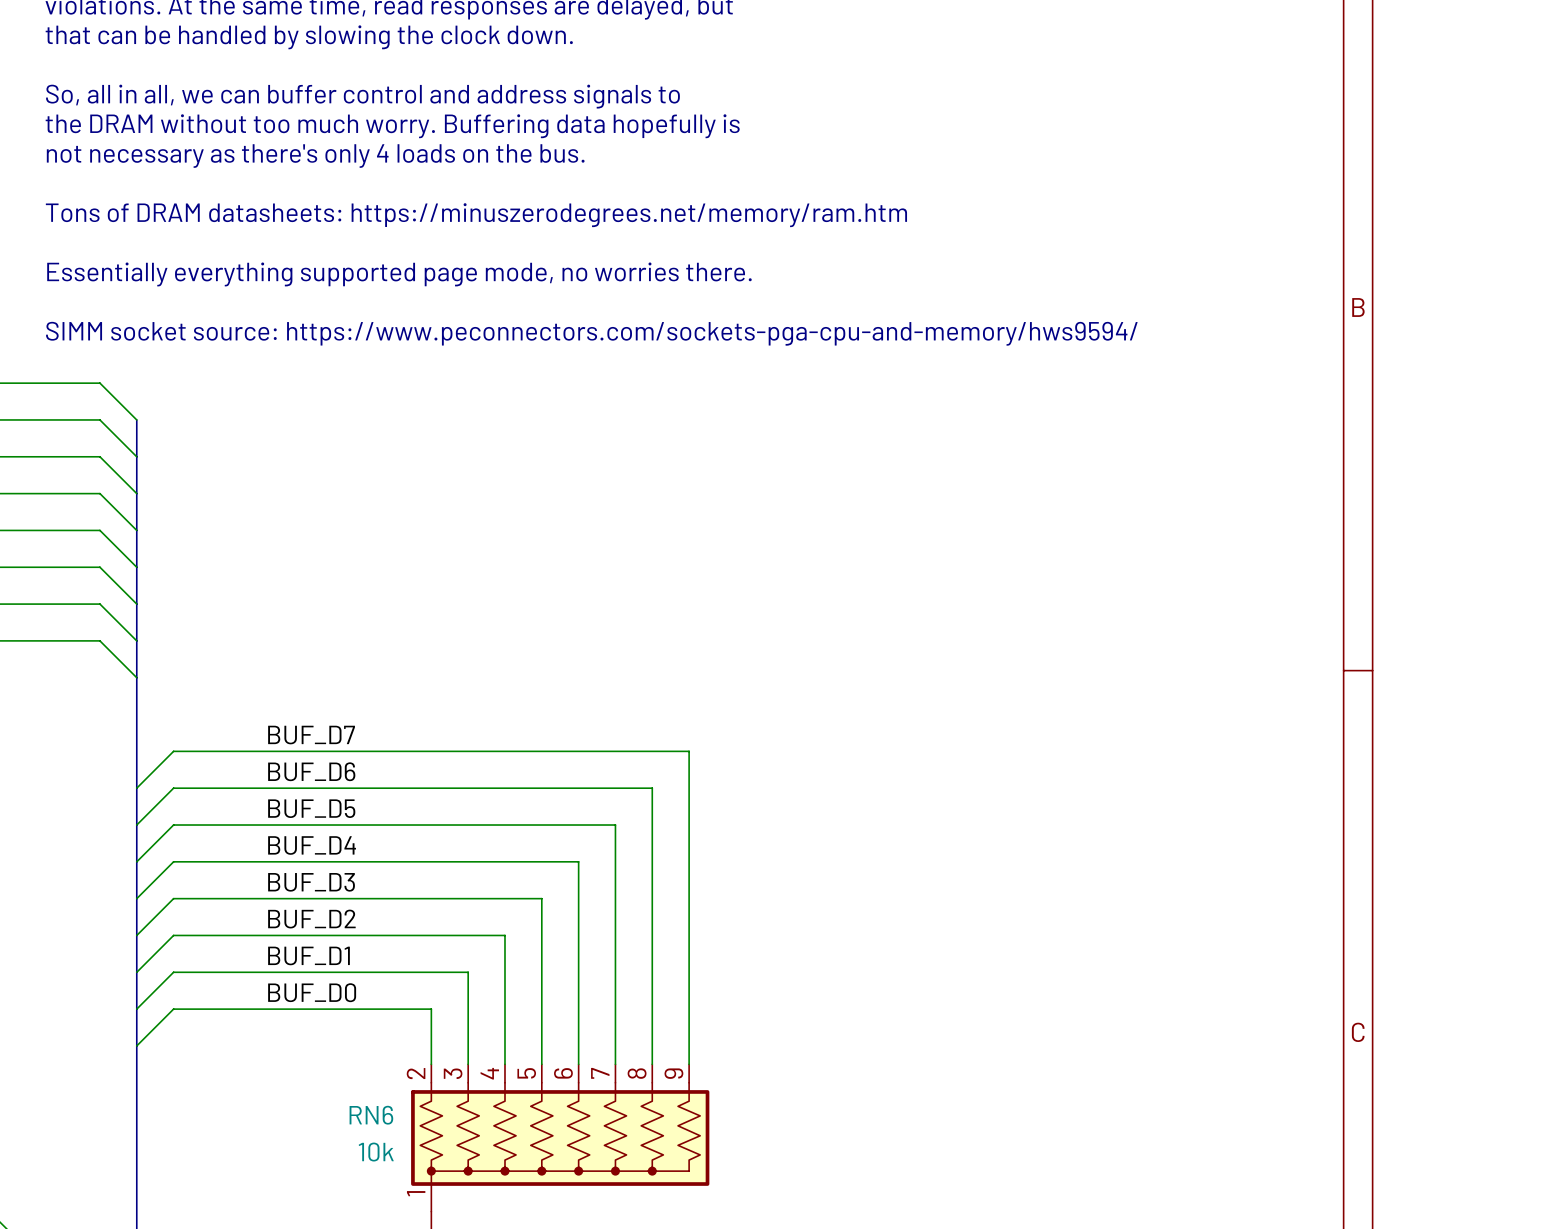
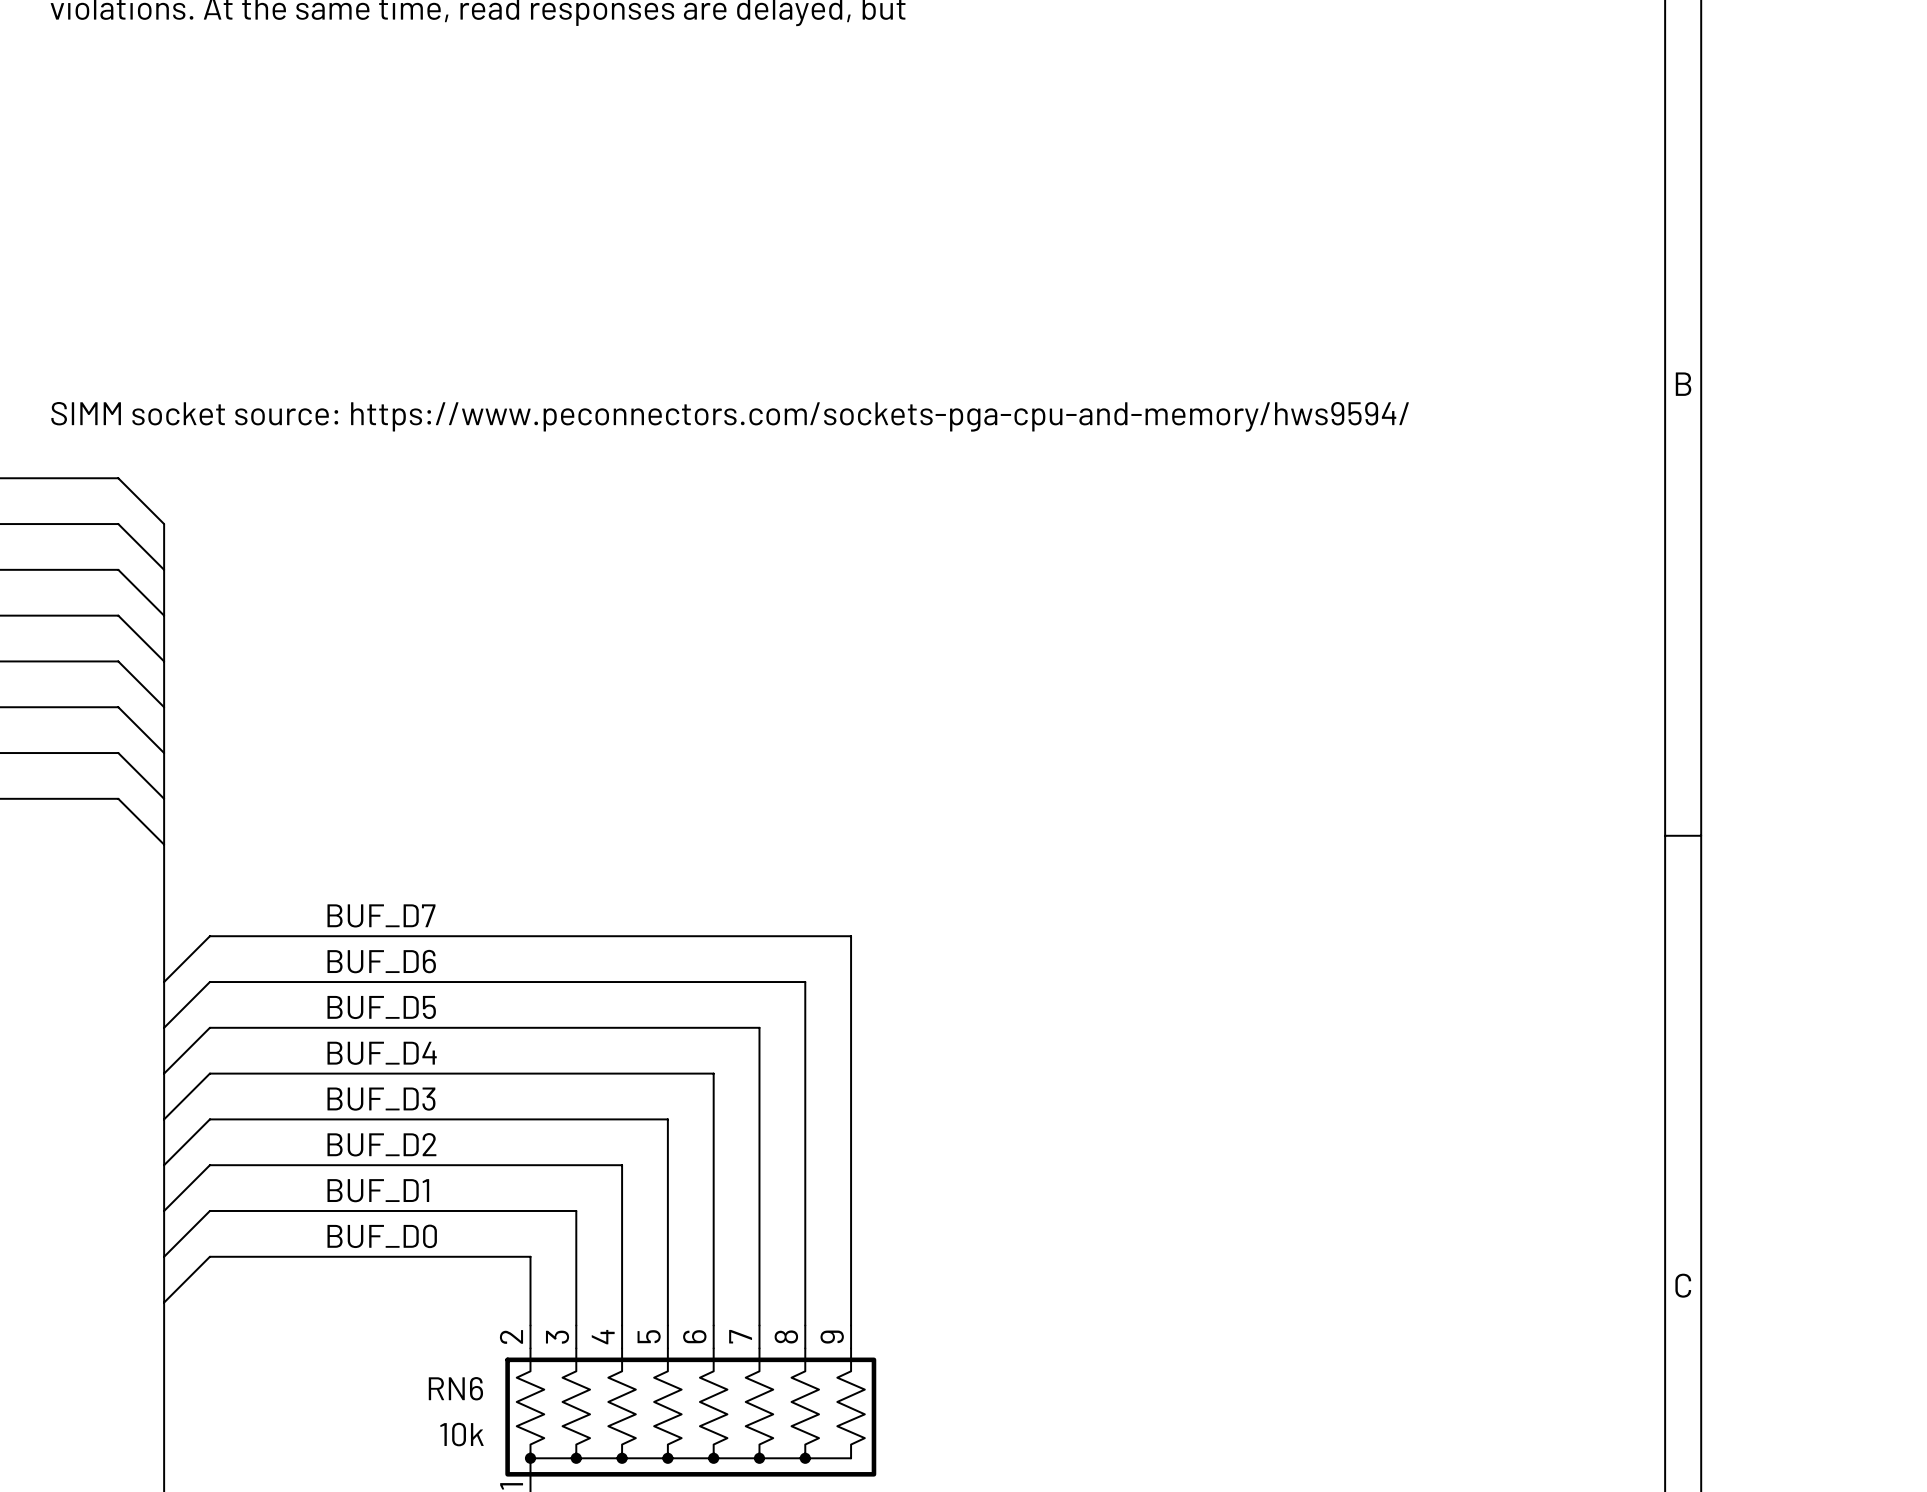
text: that can be handled by slowing the clock down. (309, 37) -> none
text: So, all in all, we can buffer control and address signals to (362, 96) -> none
text: the DRAM without too much worry. Buffering data hopefully is (392, 126) -> none
text: not necessary as there's only 4 loads on the bus. (315, 156) -> none
text: Tons of DRAM datasheets: https://minuszerodegrees.net/memory/ram.htm (476, 215) -> none
text: Essentially everything supported page mode, no worries there. (399, 274) -> none

